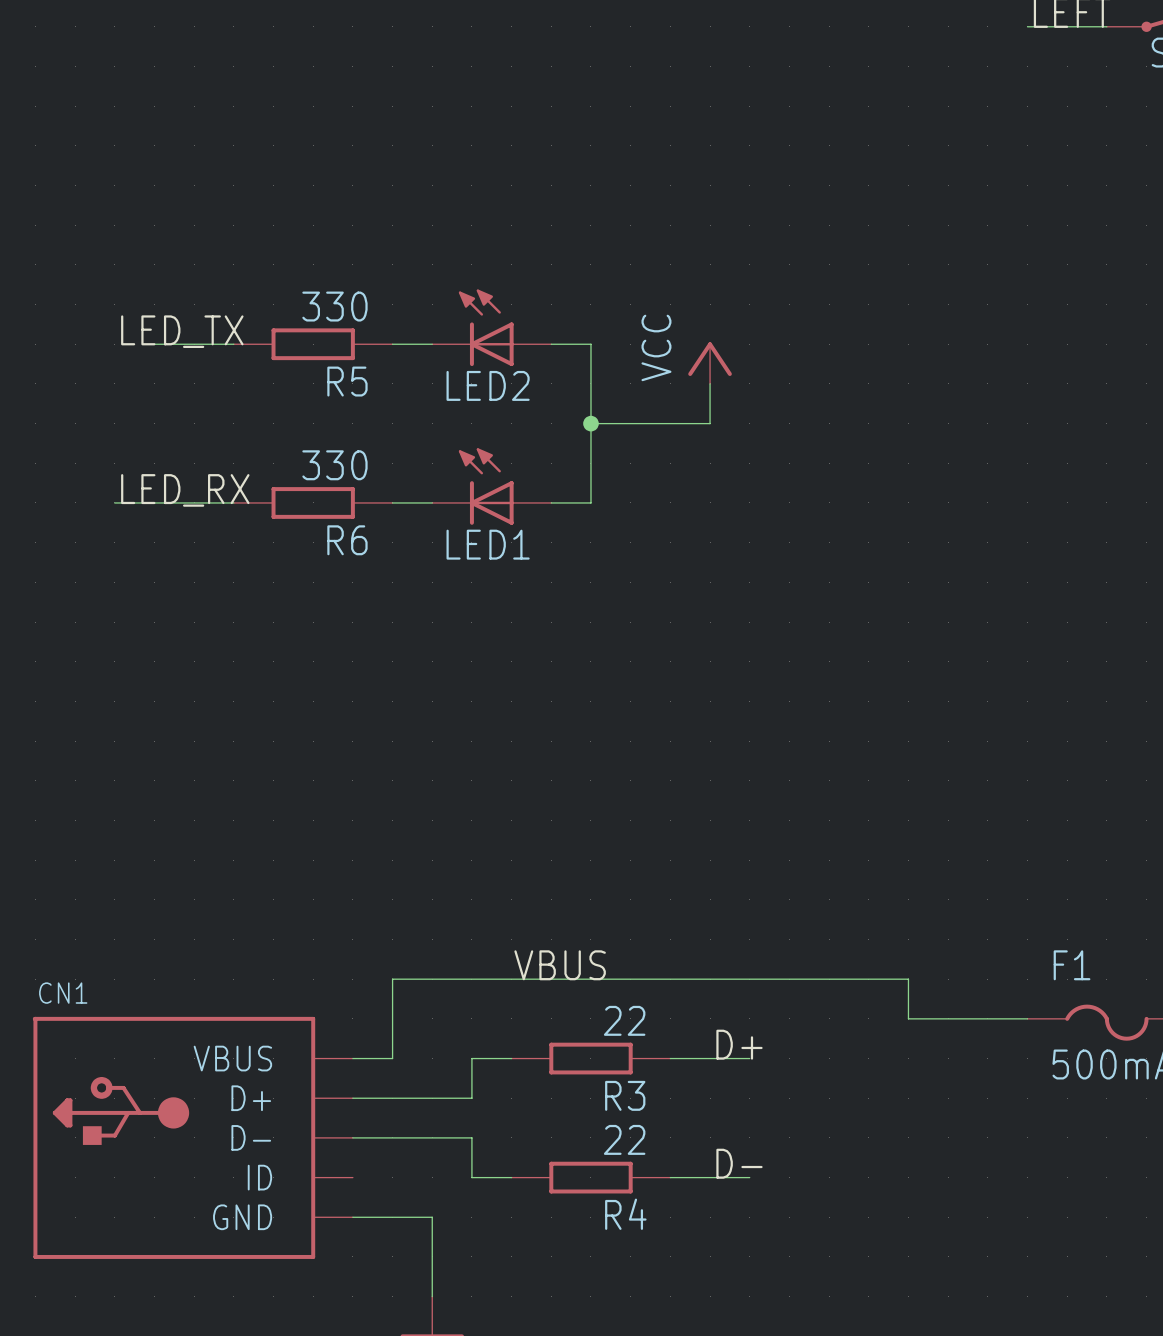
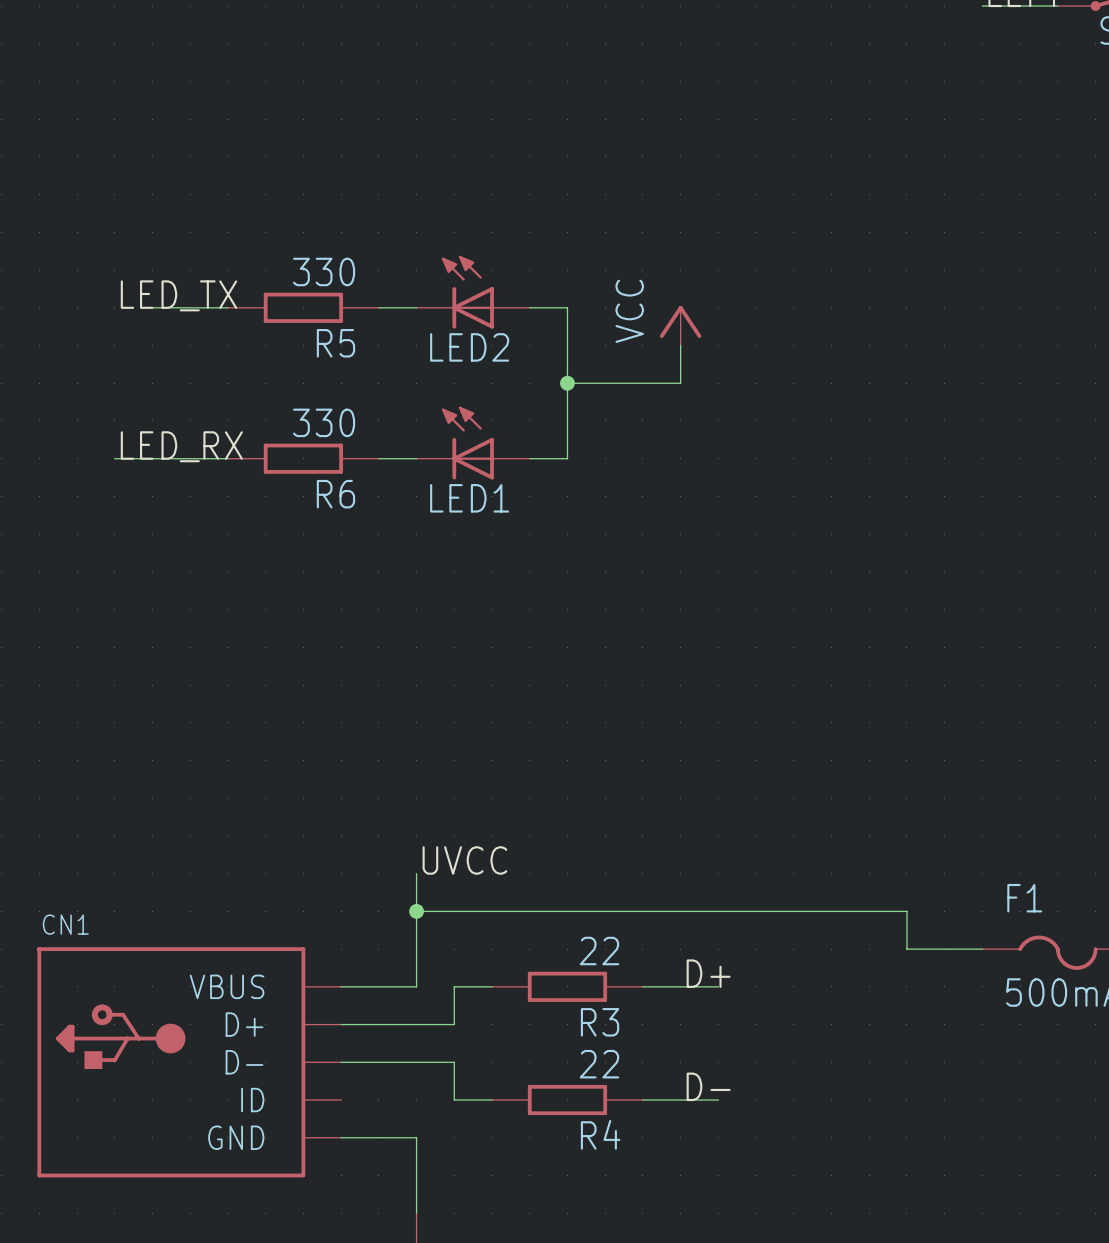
label: none -> UVCC (464, 860)
label: VBUS (560, 965) -> none
wire: (432, 979) (392, 979) (392, 1058) -> (416, 873) (416, 986) (378, 986)
junction: none -> (416, 911)
wire: (908, 979) (908, 1018) (948, 1018) -> (869, 911) (906, 911) (906, 949)

